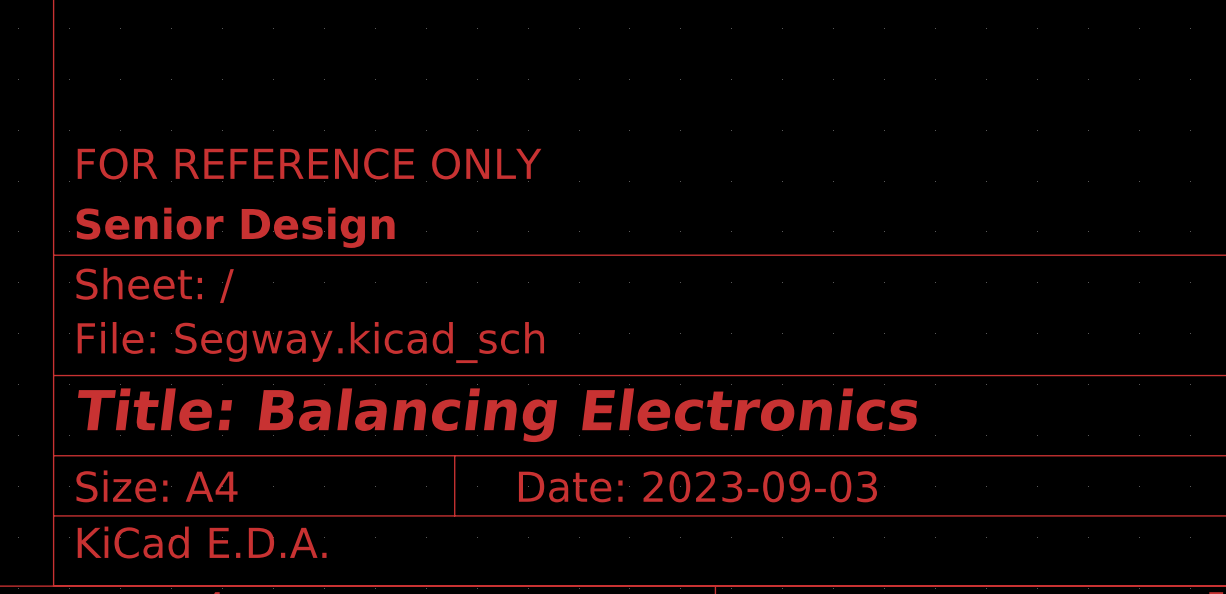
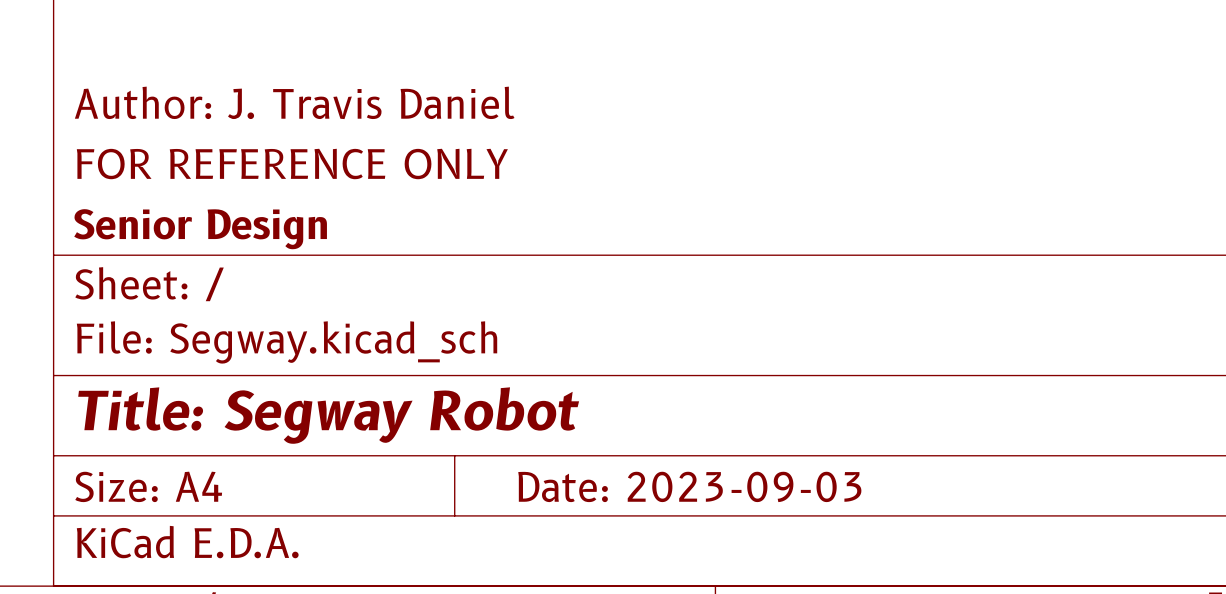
title block: none -> Author: J. Travis Daniel (294, 102)
title block: Title: Balancing Electronics (497, 415) -> Title: Segway Robot (328, 415)

